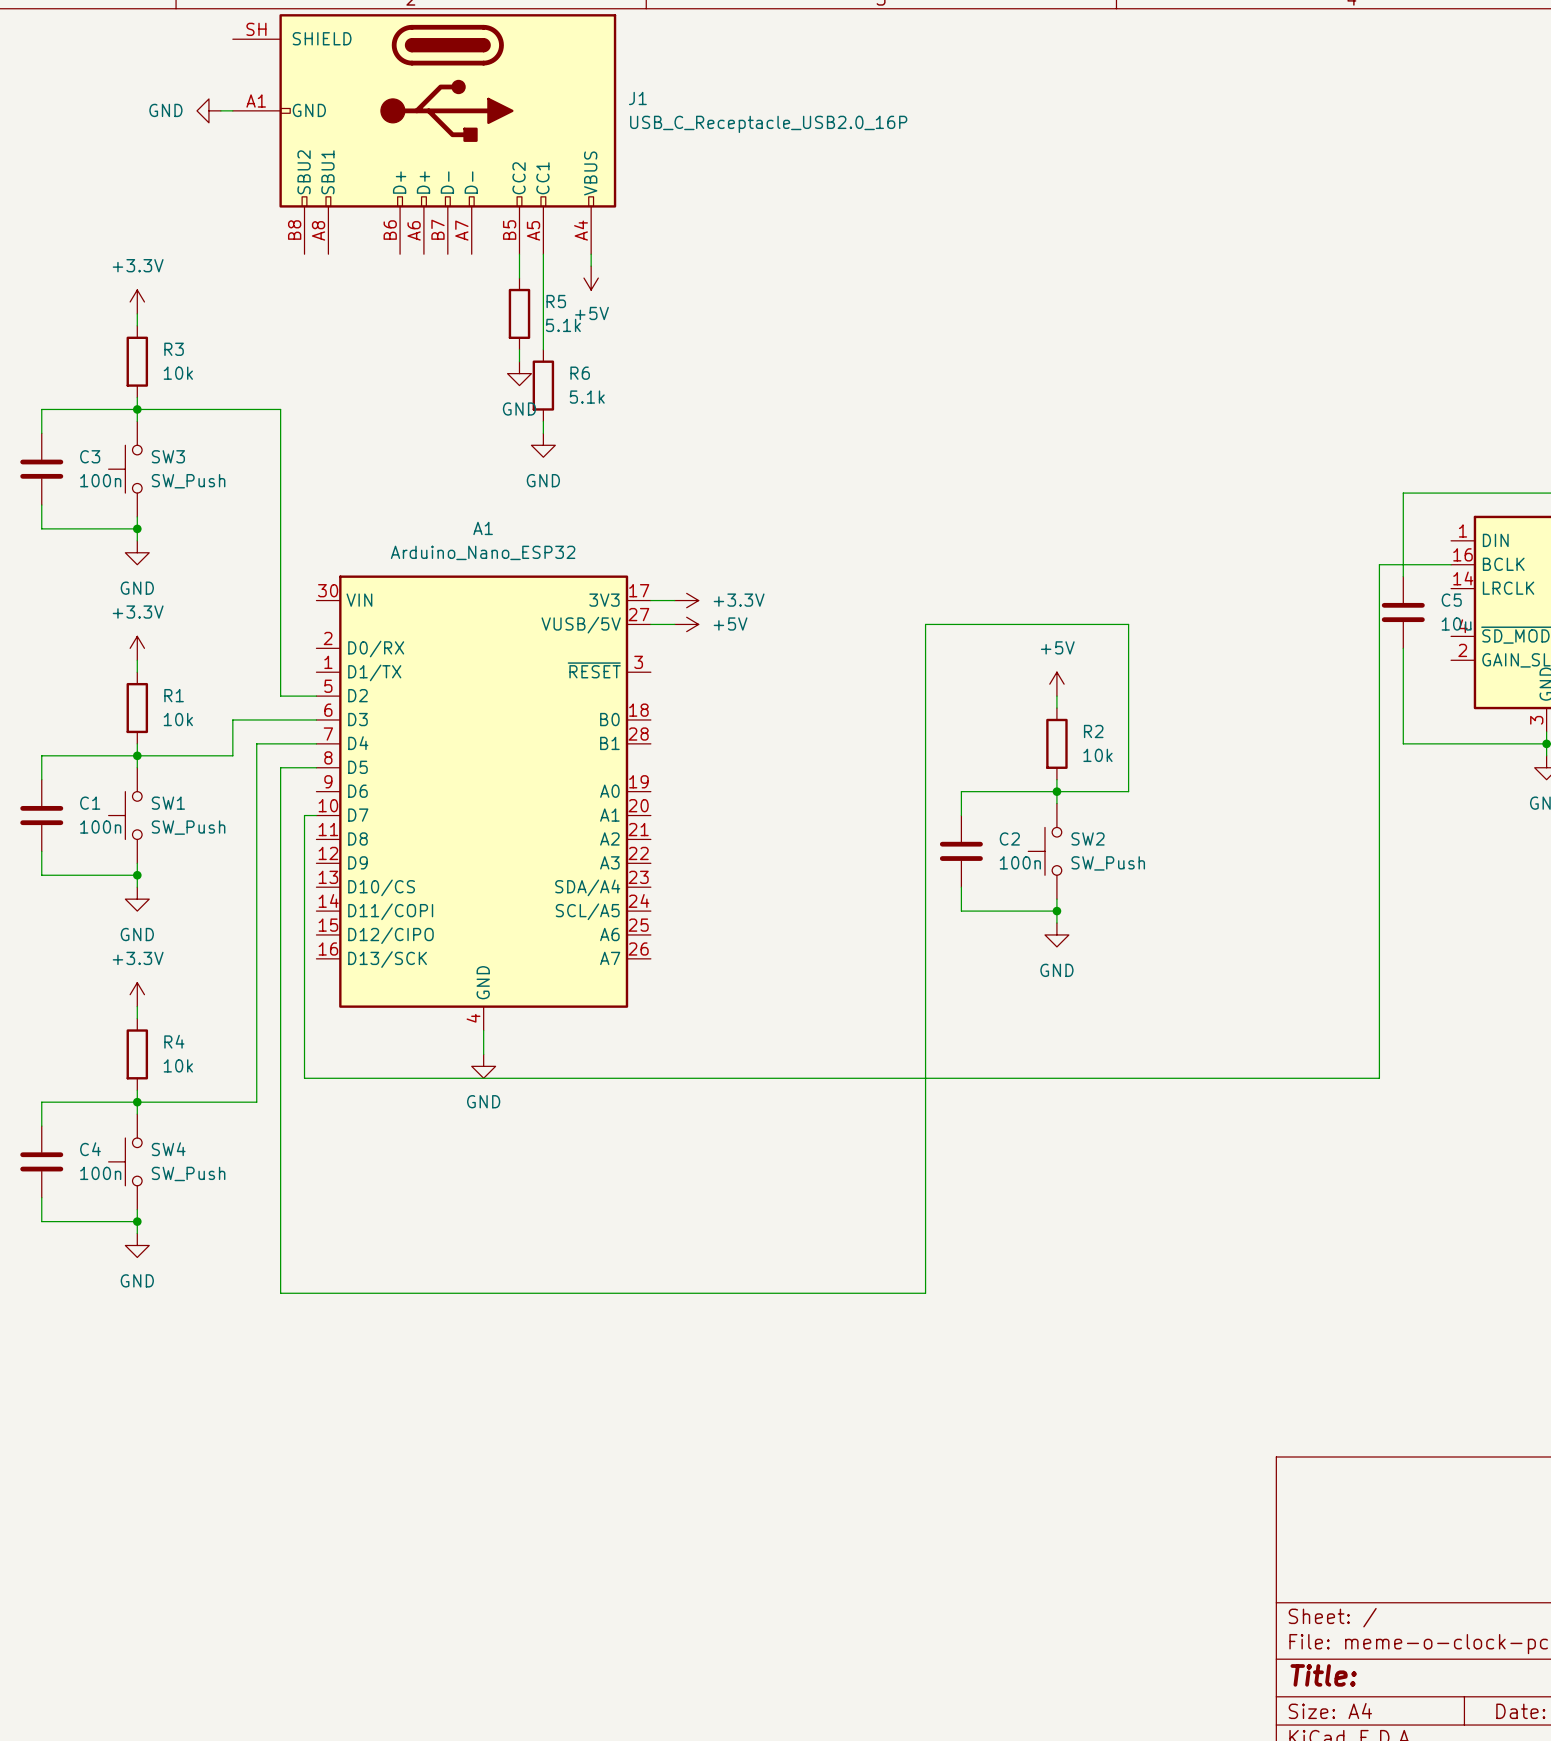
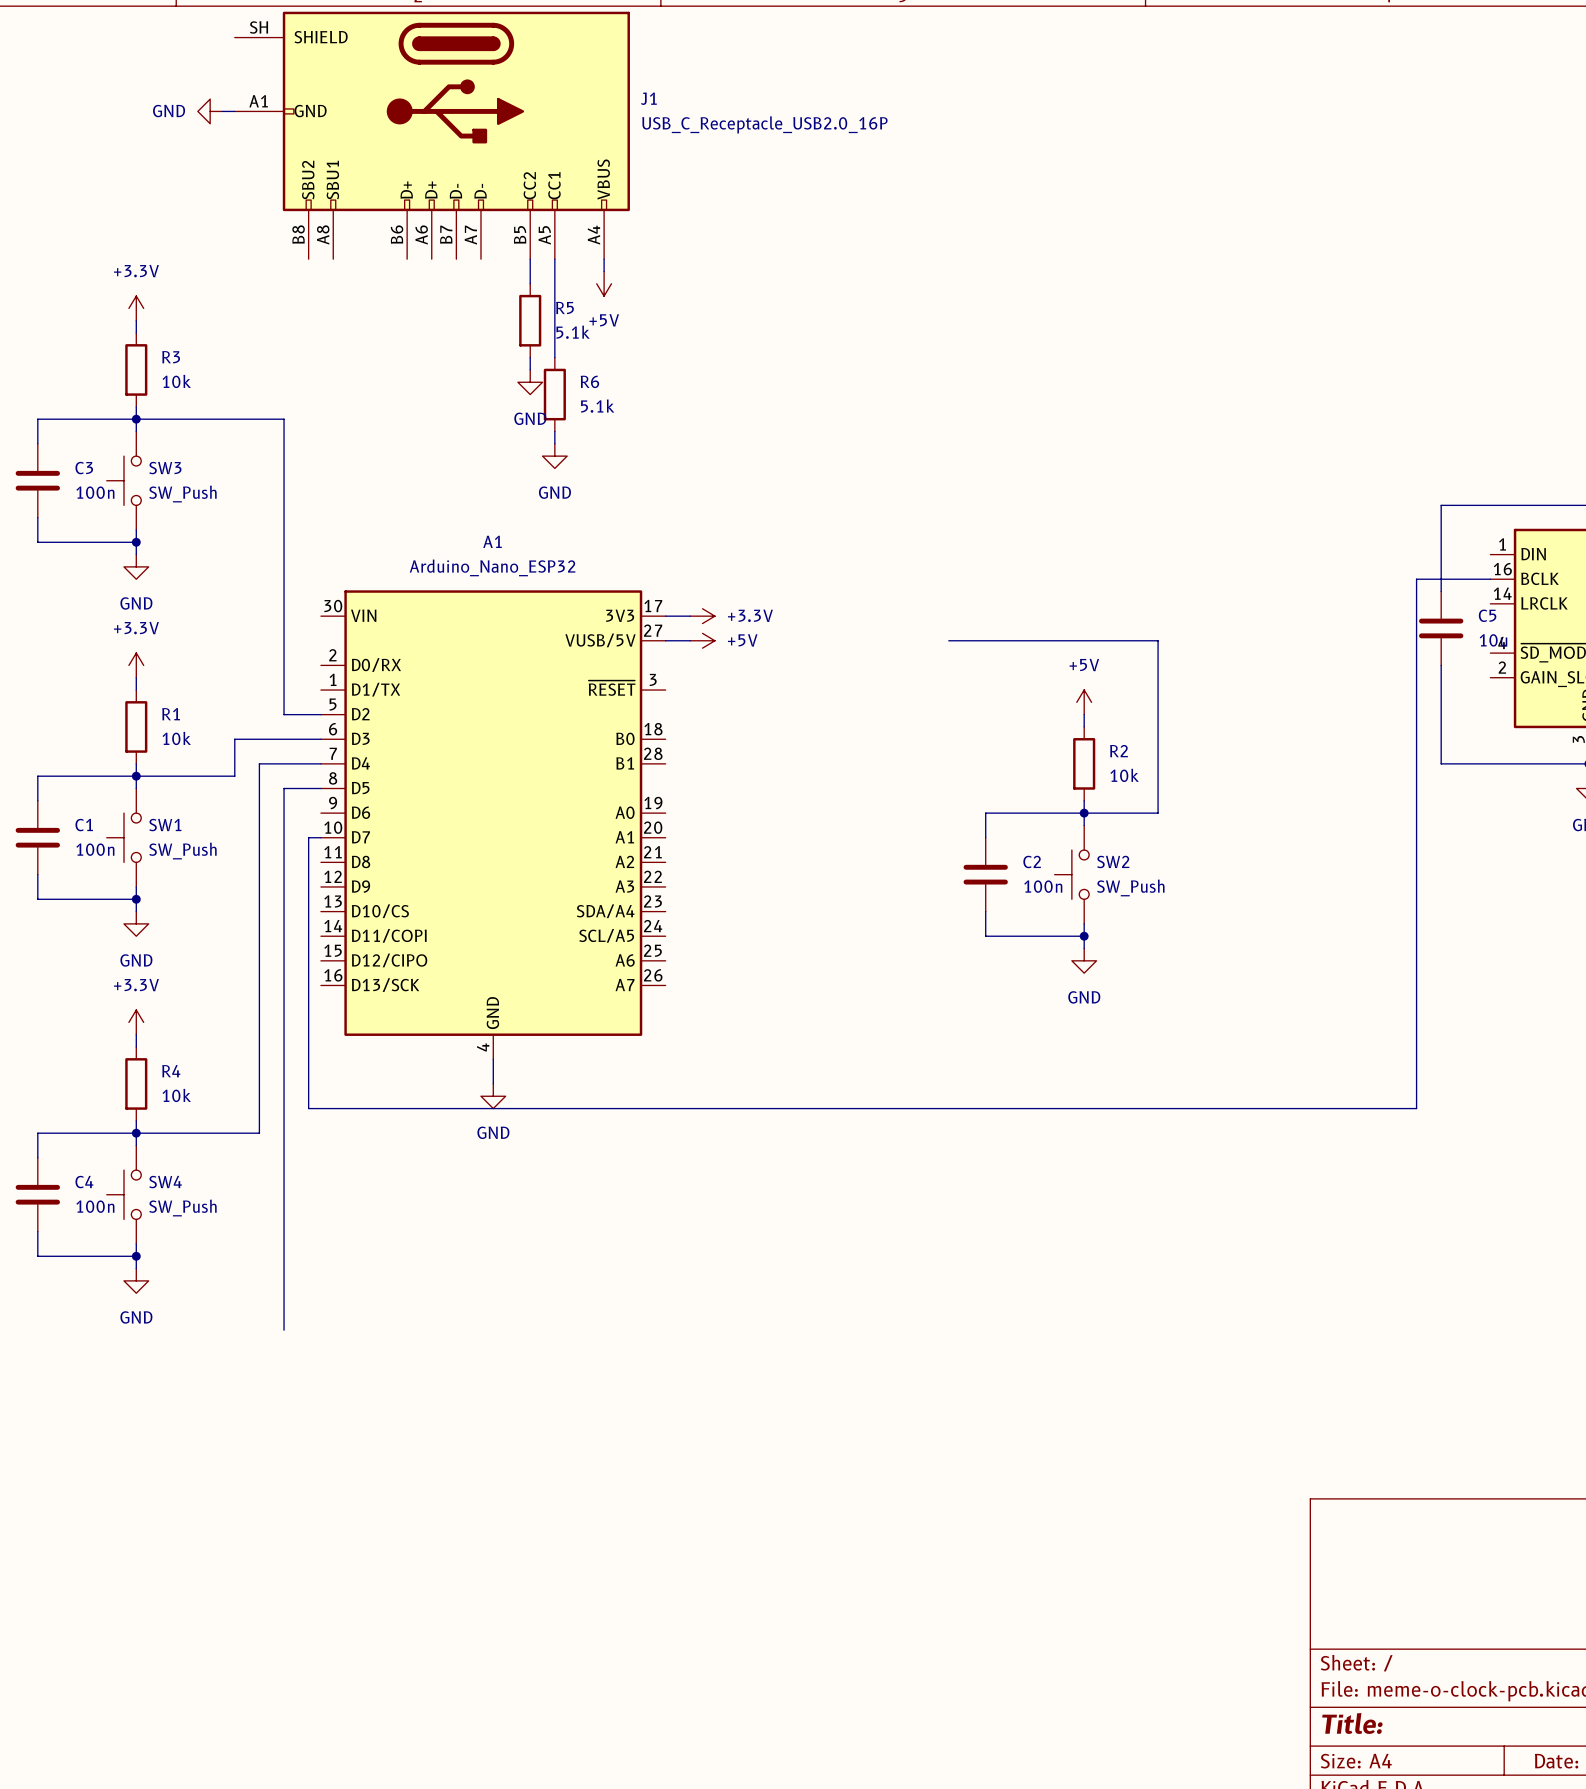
wire: (925, 624) (925, 1293) (280, 1293) -> none

